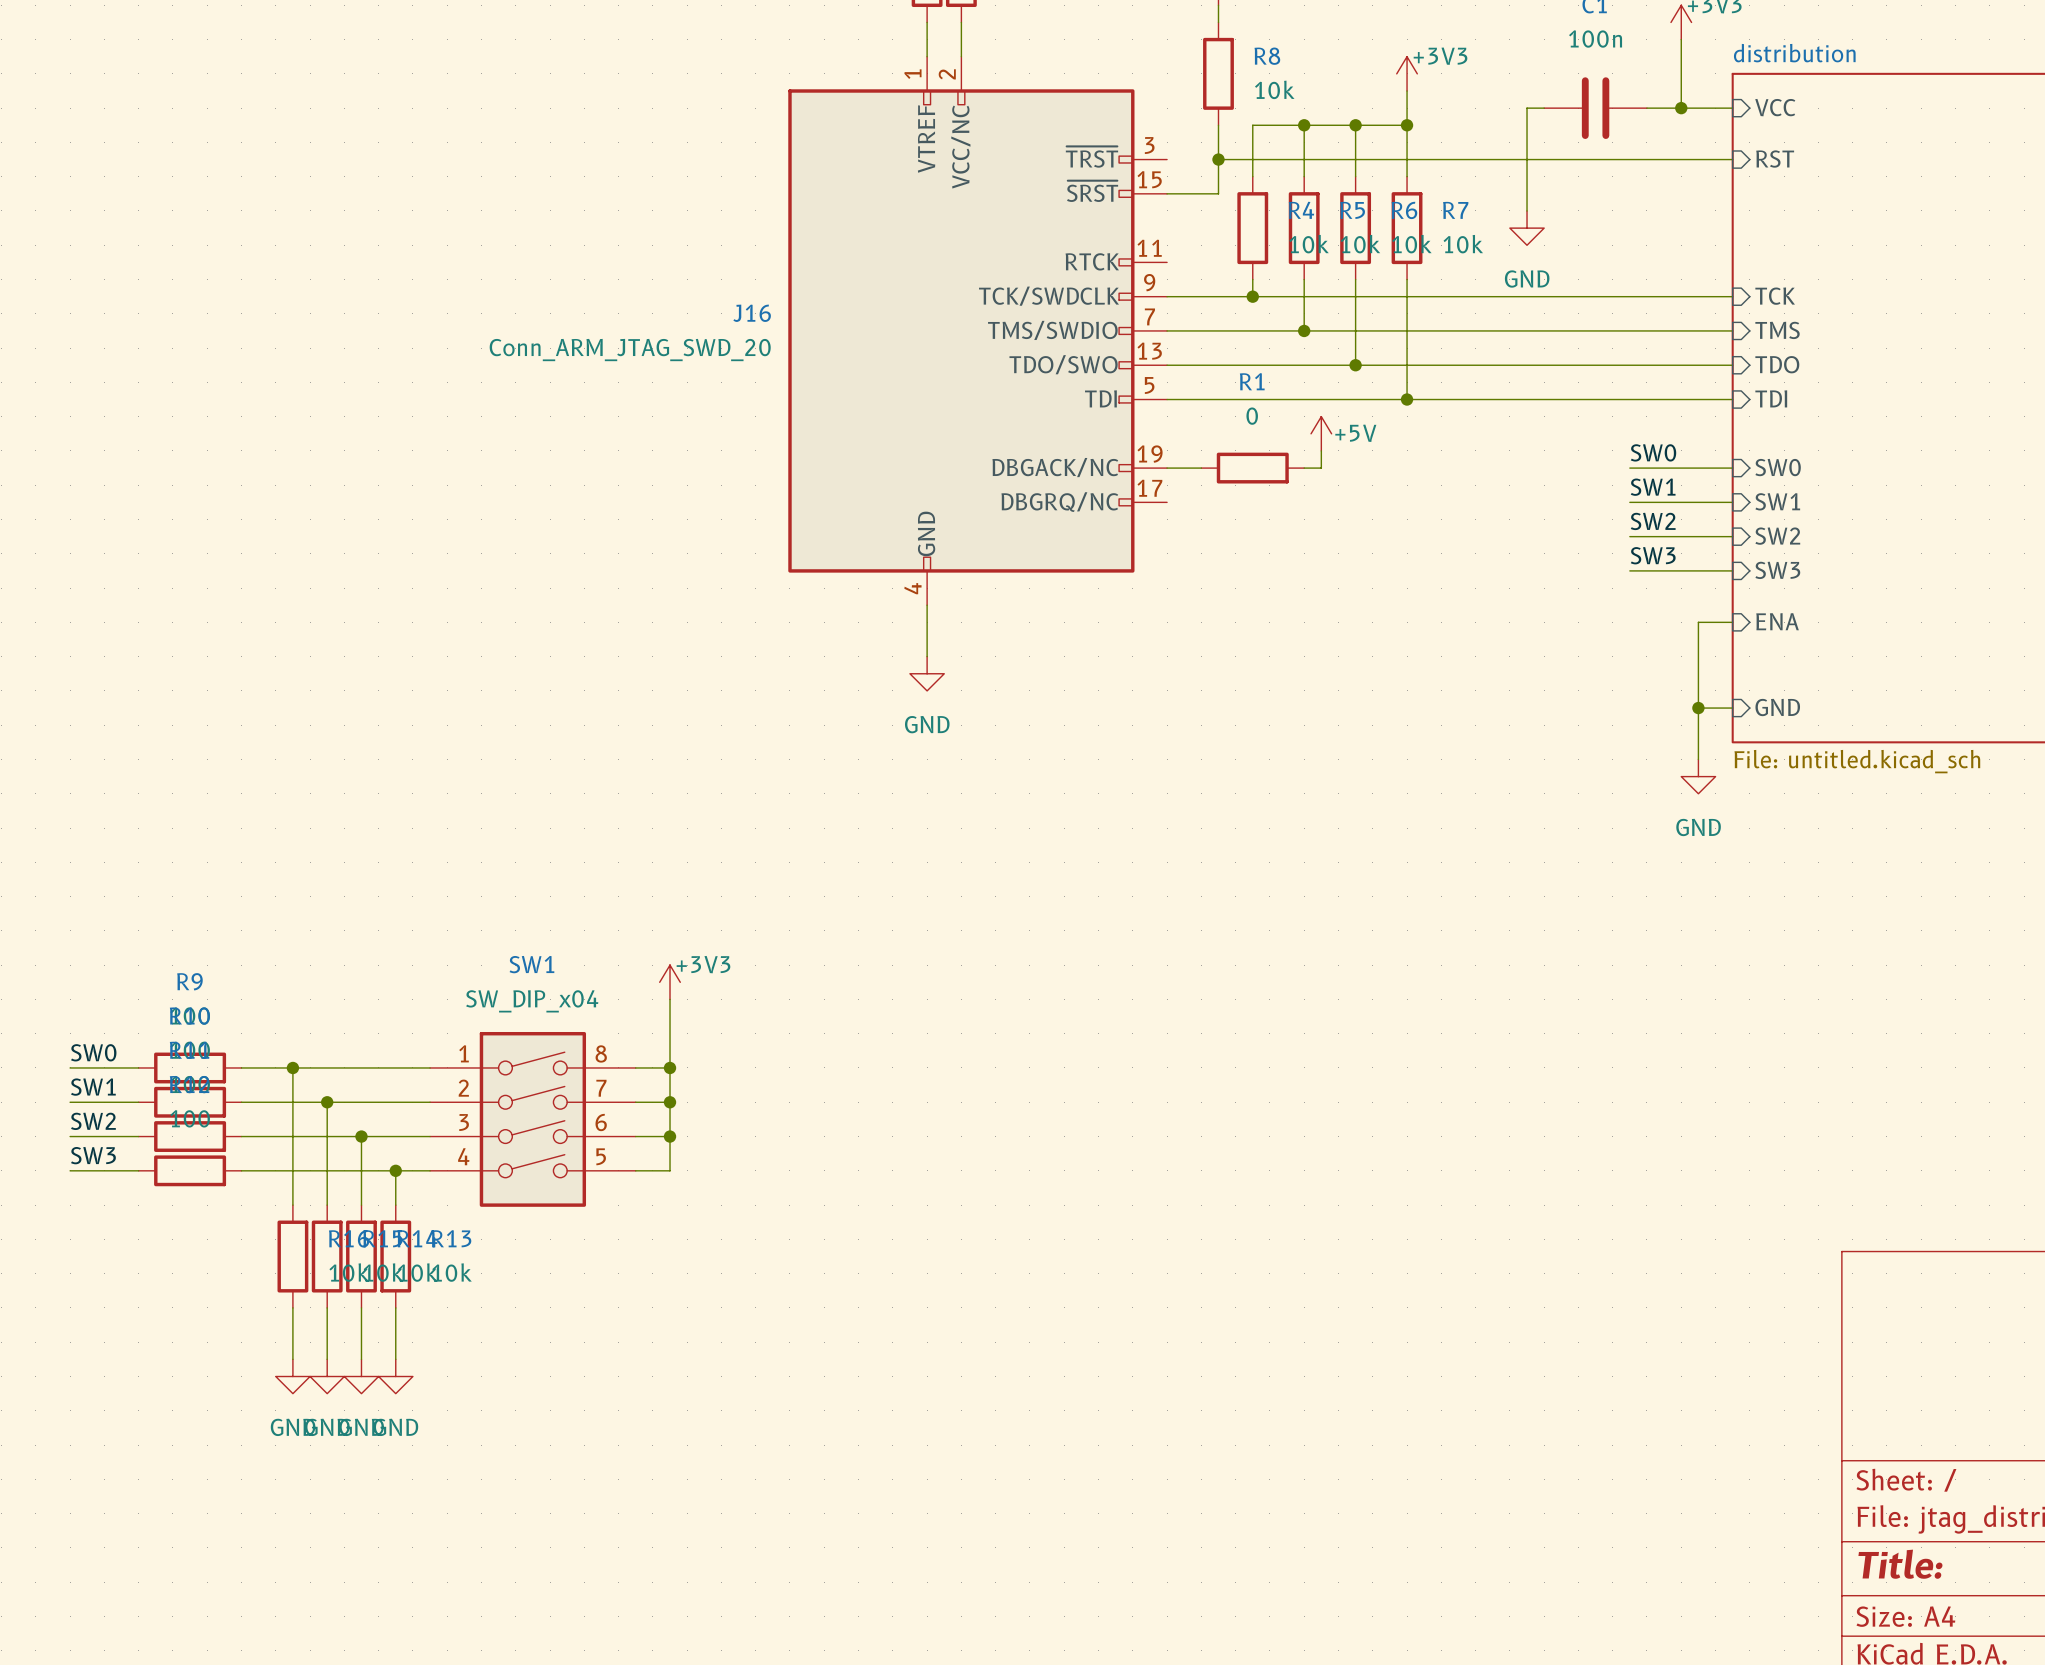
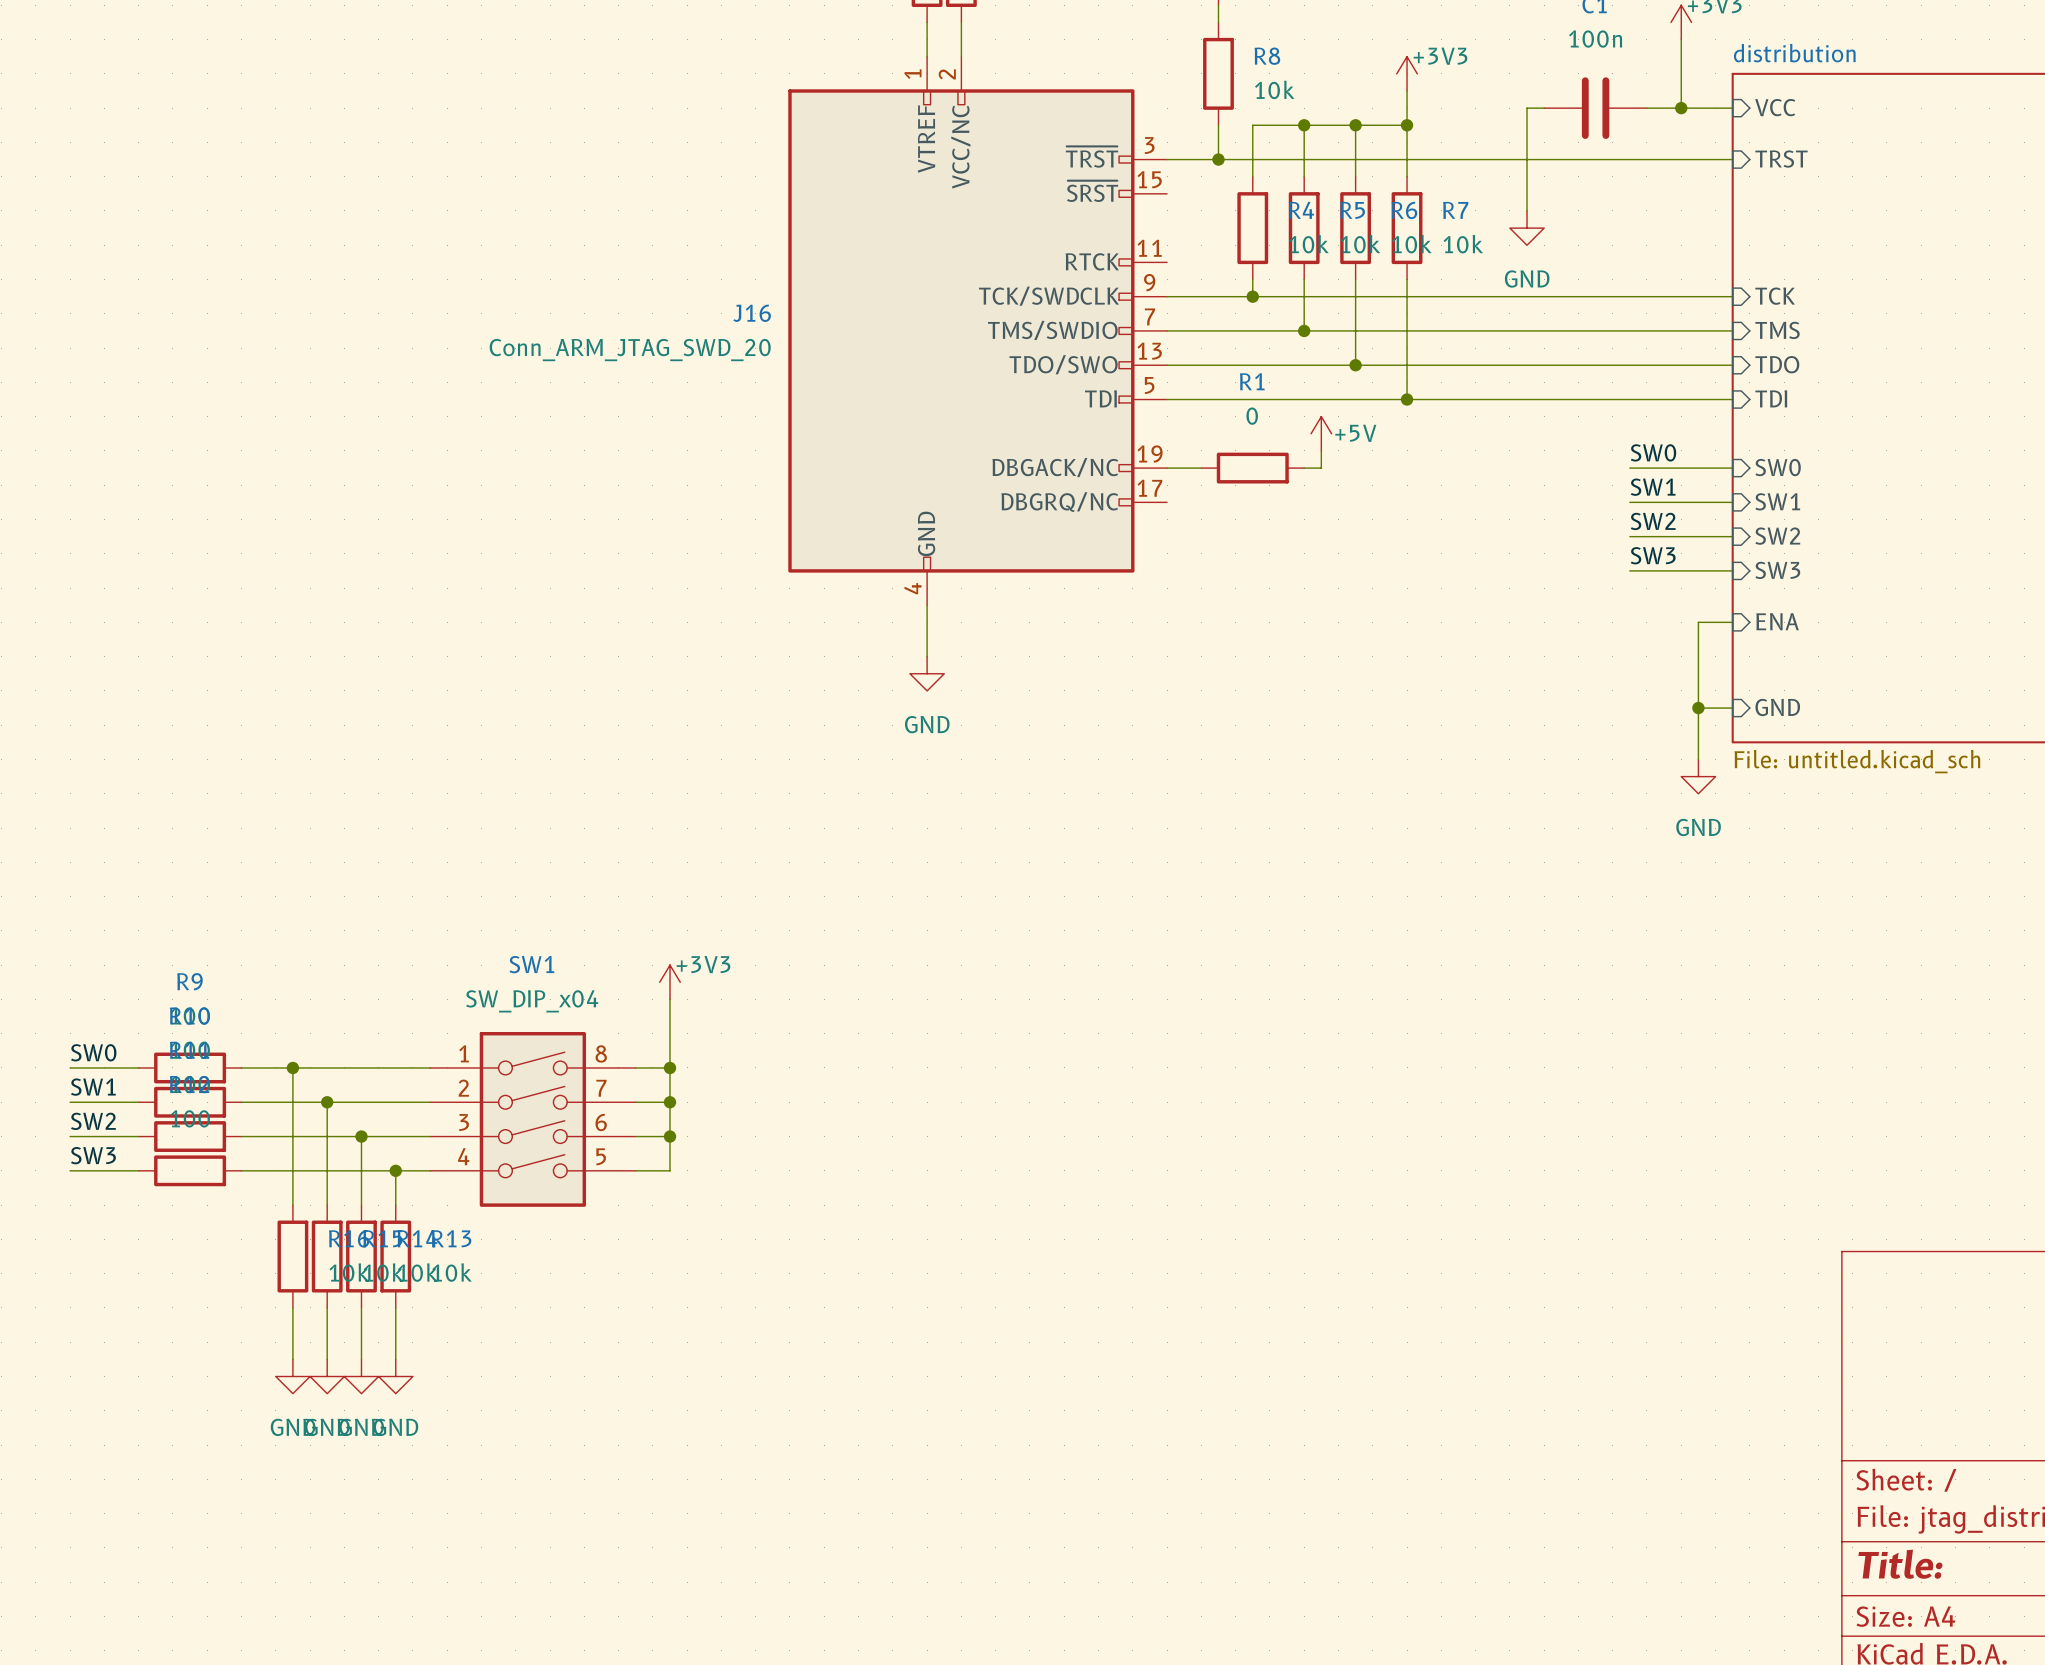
wire: (1218, 159) (1218, 193) (1167, 193) -> (1218, 159) (1167, 159)
sheet pin: RST (1775, 159) -> TRST (1781, 159)

